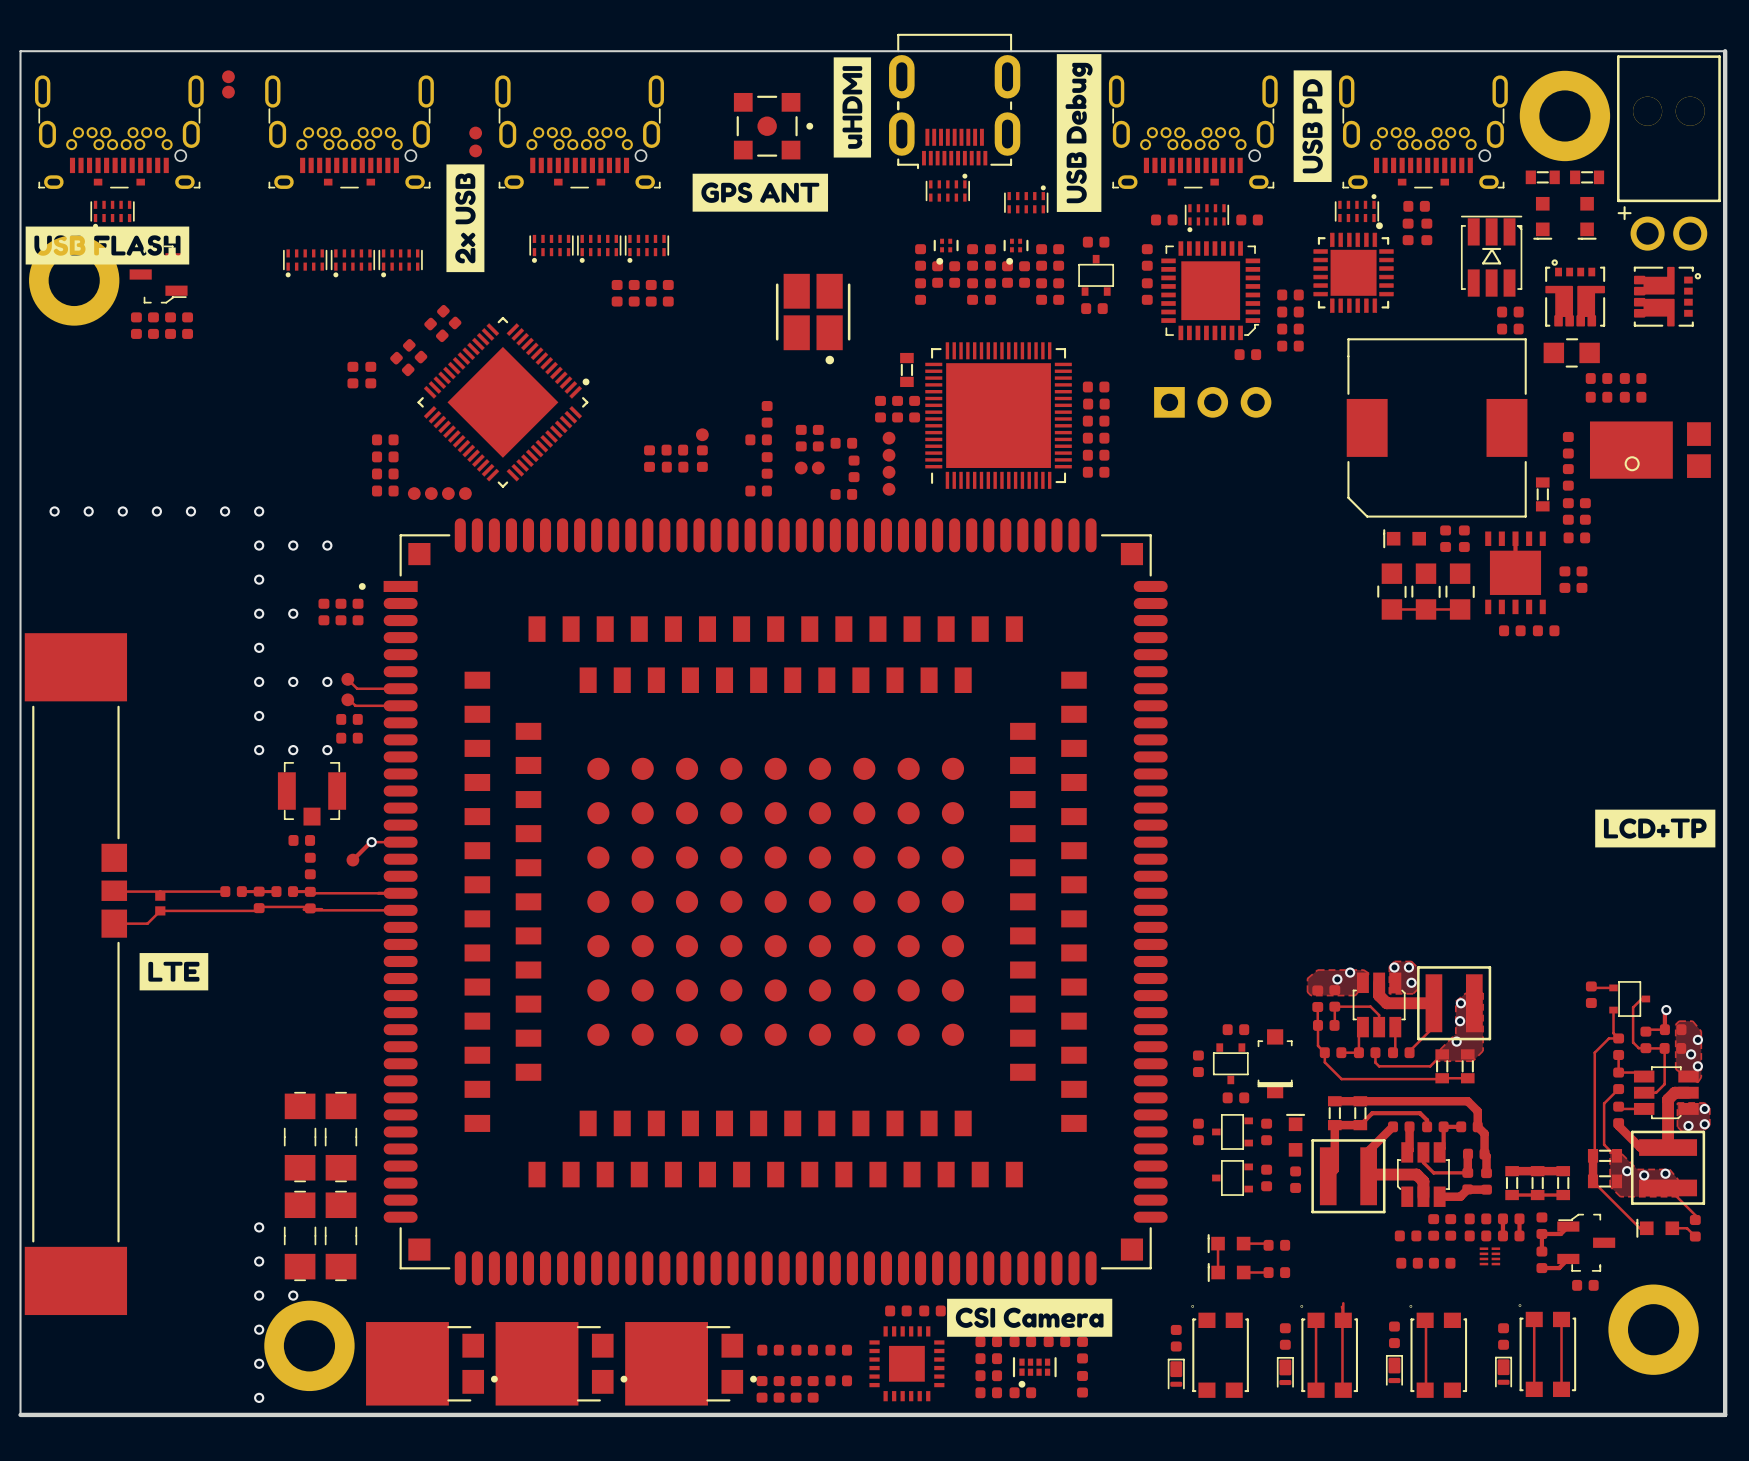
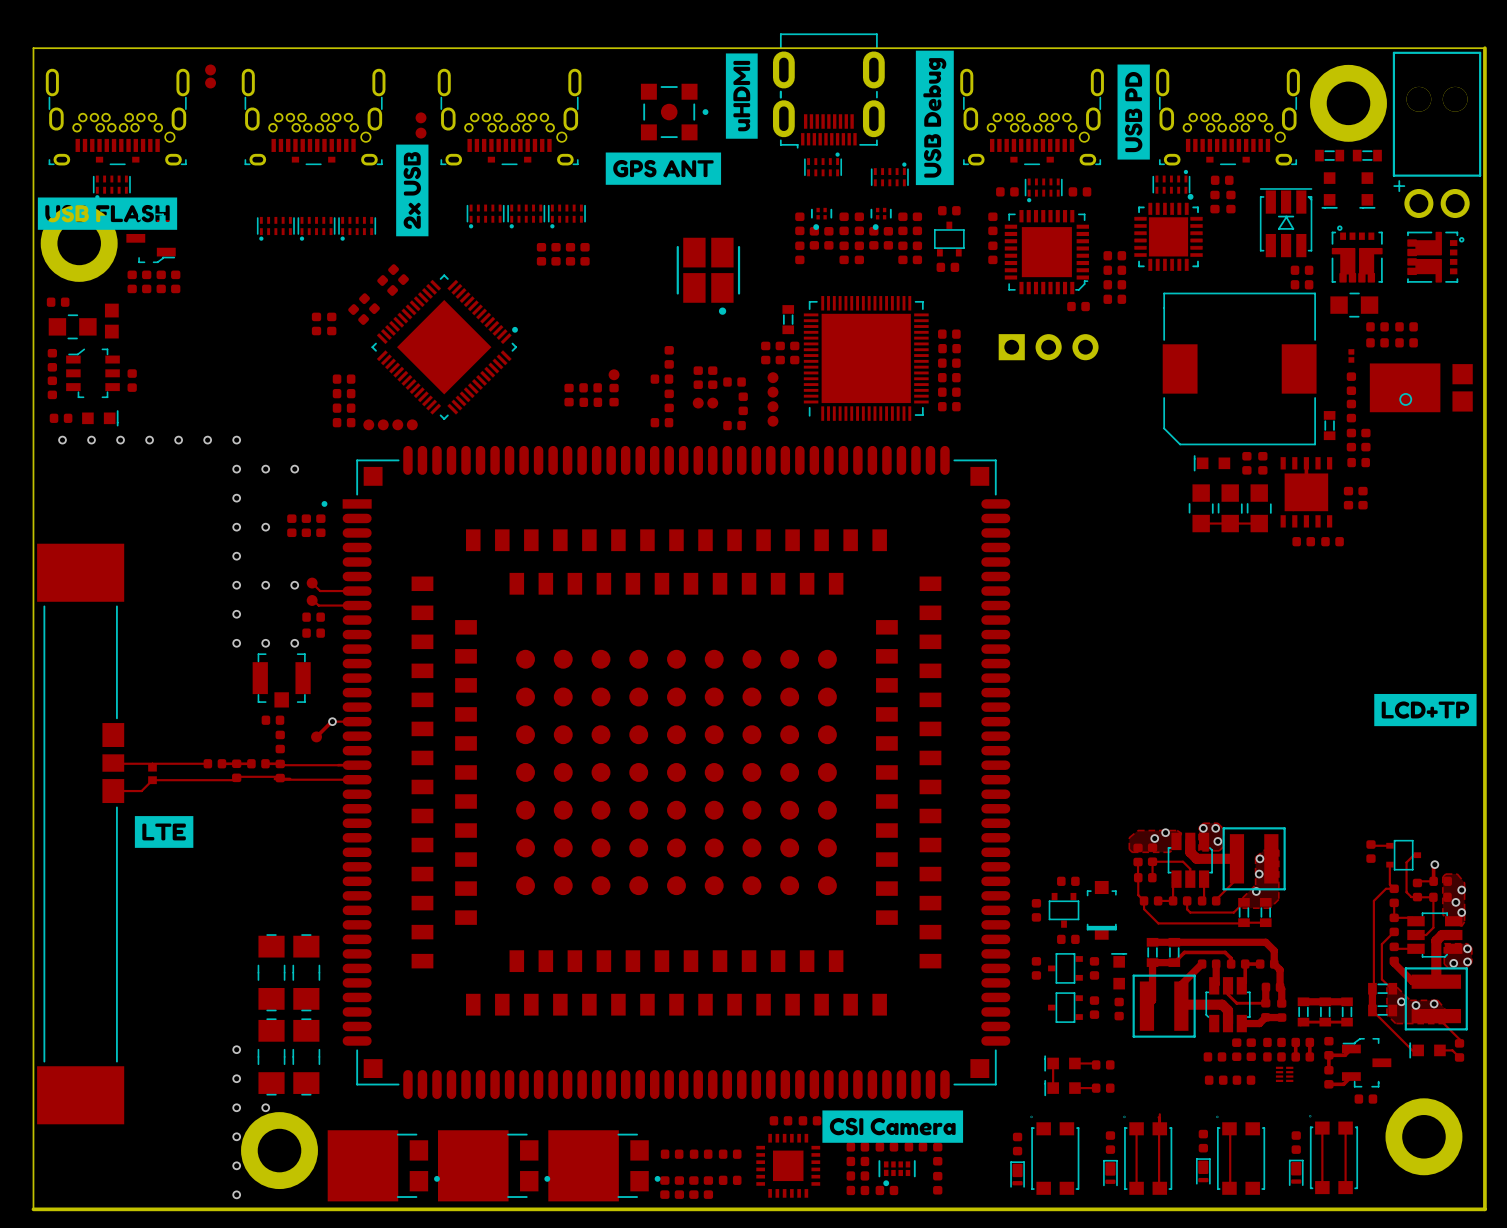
part: none -> (58, 302)
part: none -> (111, 321)
part: none -> (72, 326)
part: none -> (1351, 355)
part: none -> (52, 360)
part: none -> (92, 373)
part: none -> (132, 380)
part: none -> (52, 387)
part: none -> (61, 418)
part: none -> (100, 418)

